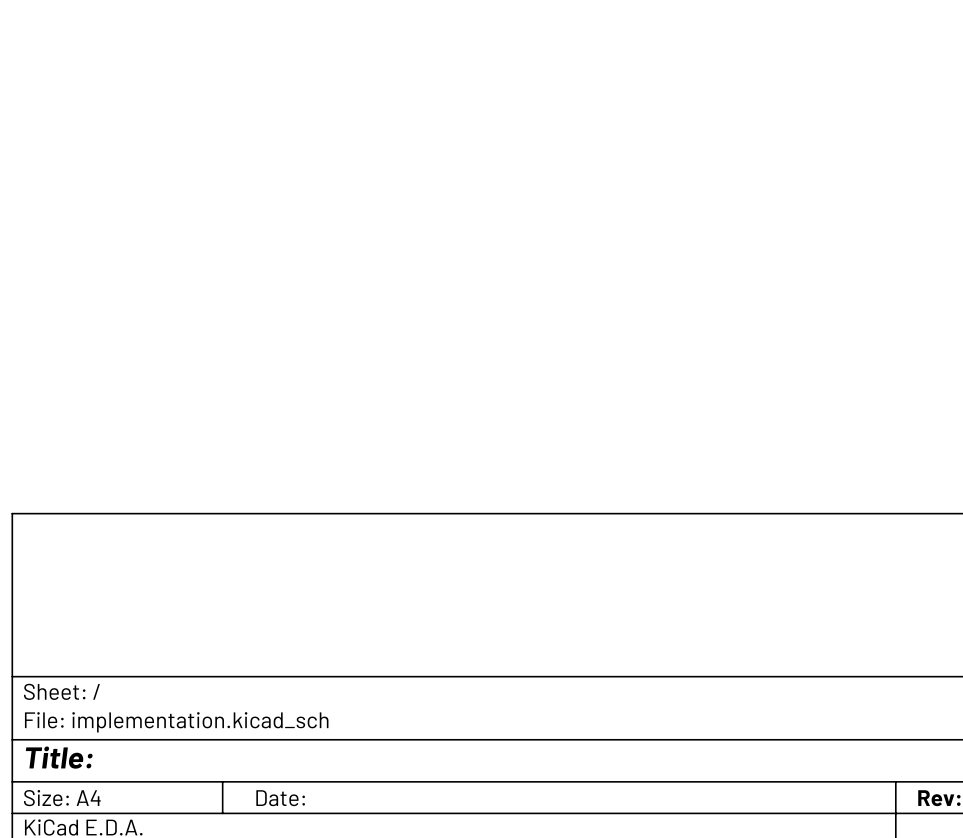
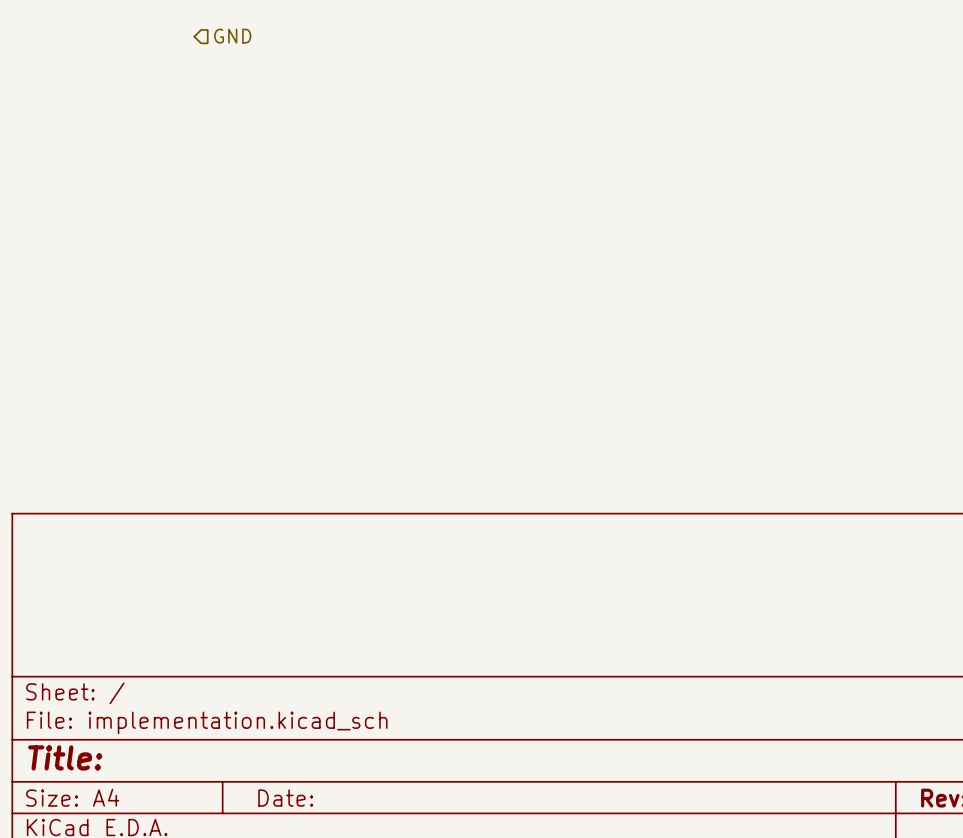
hierarchical label: none -> GND (232, 36)

